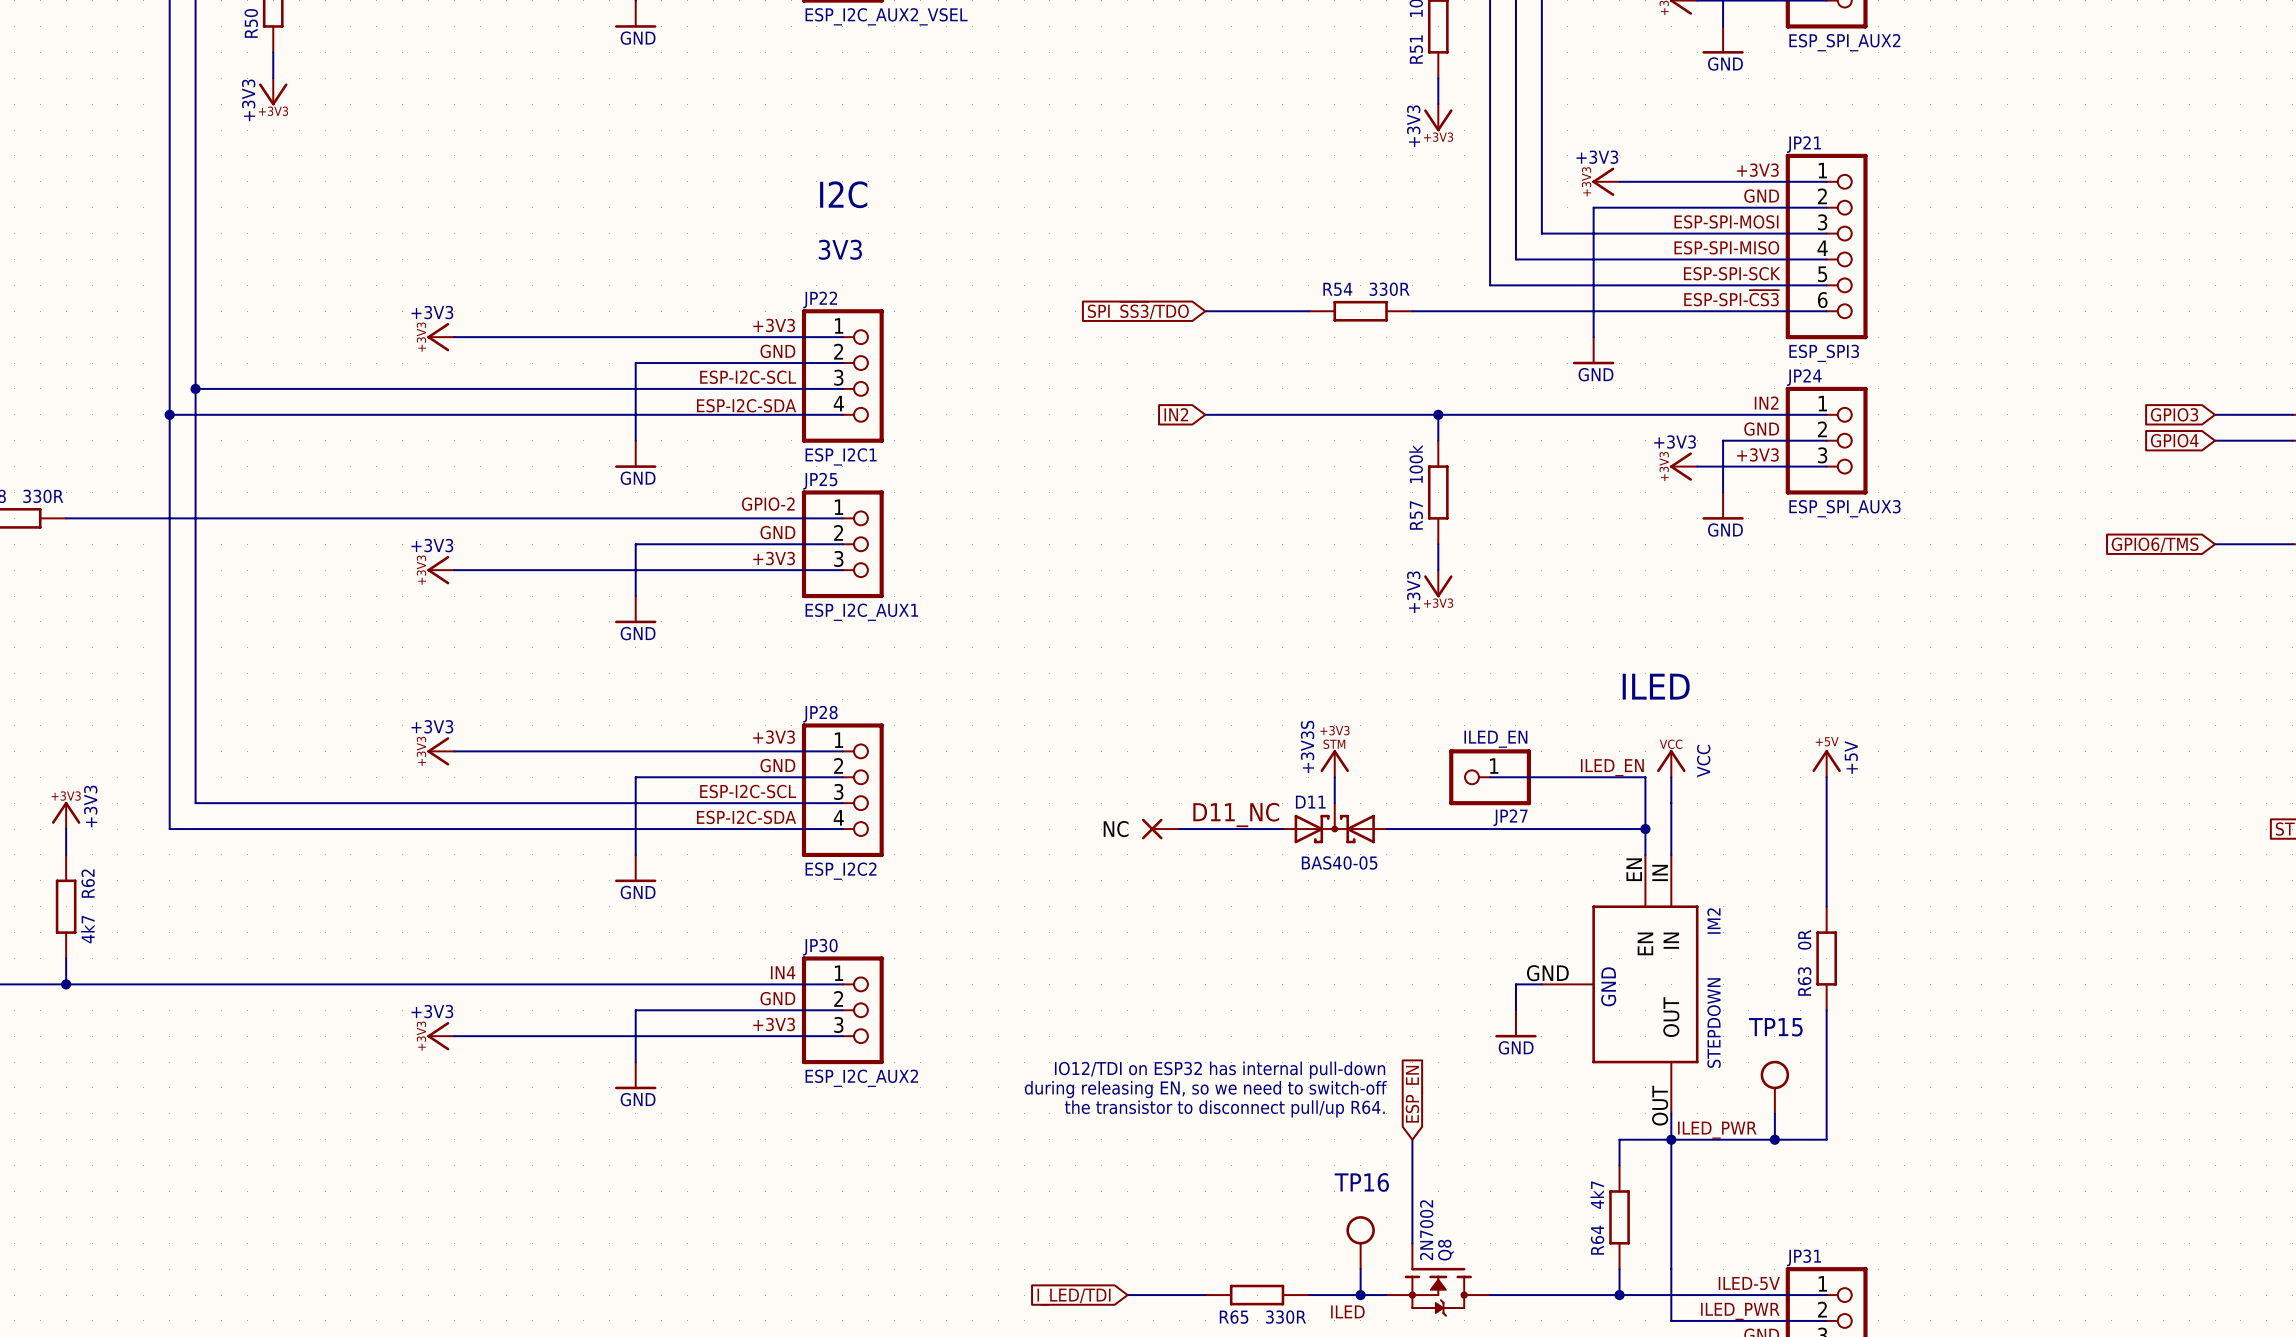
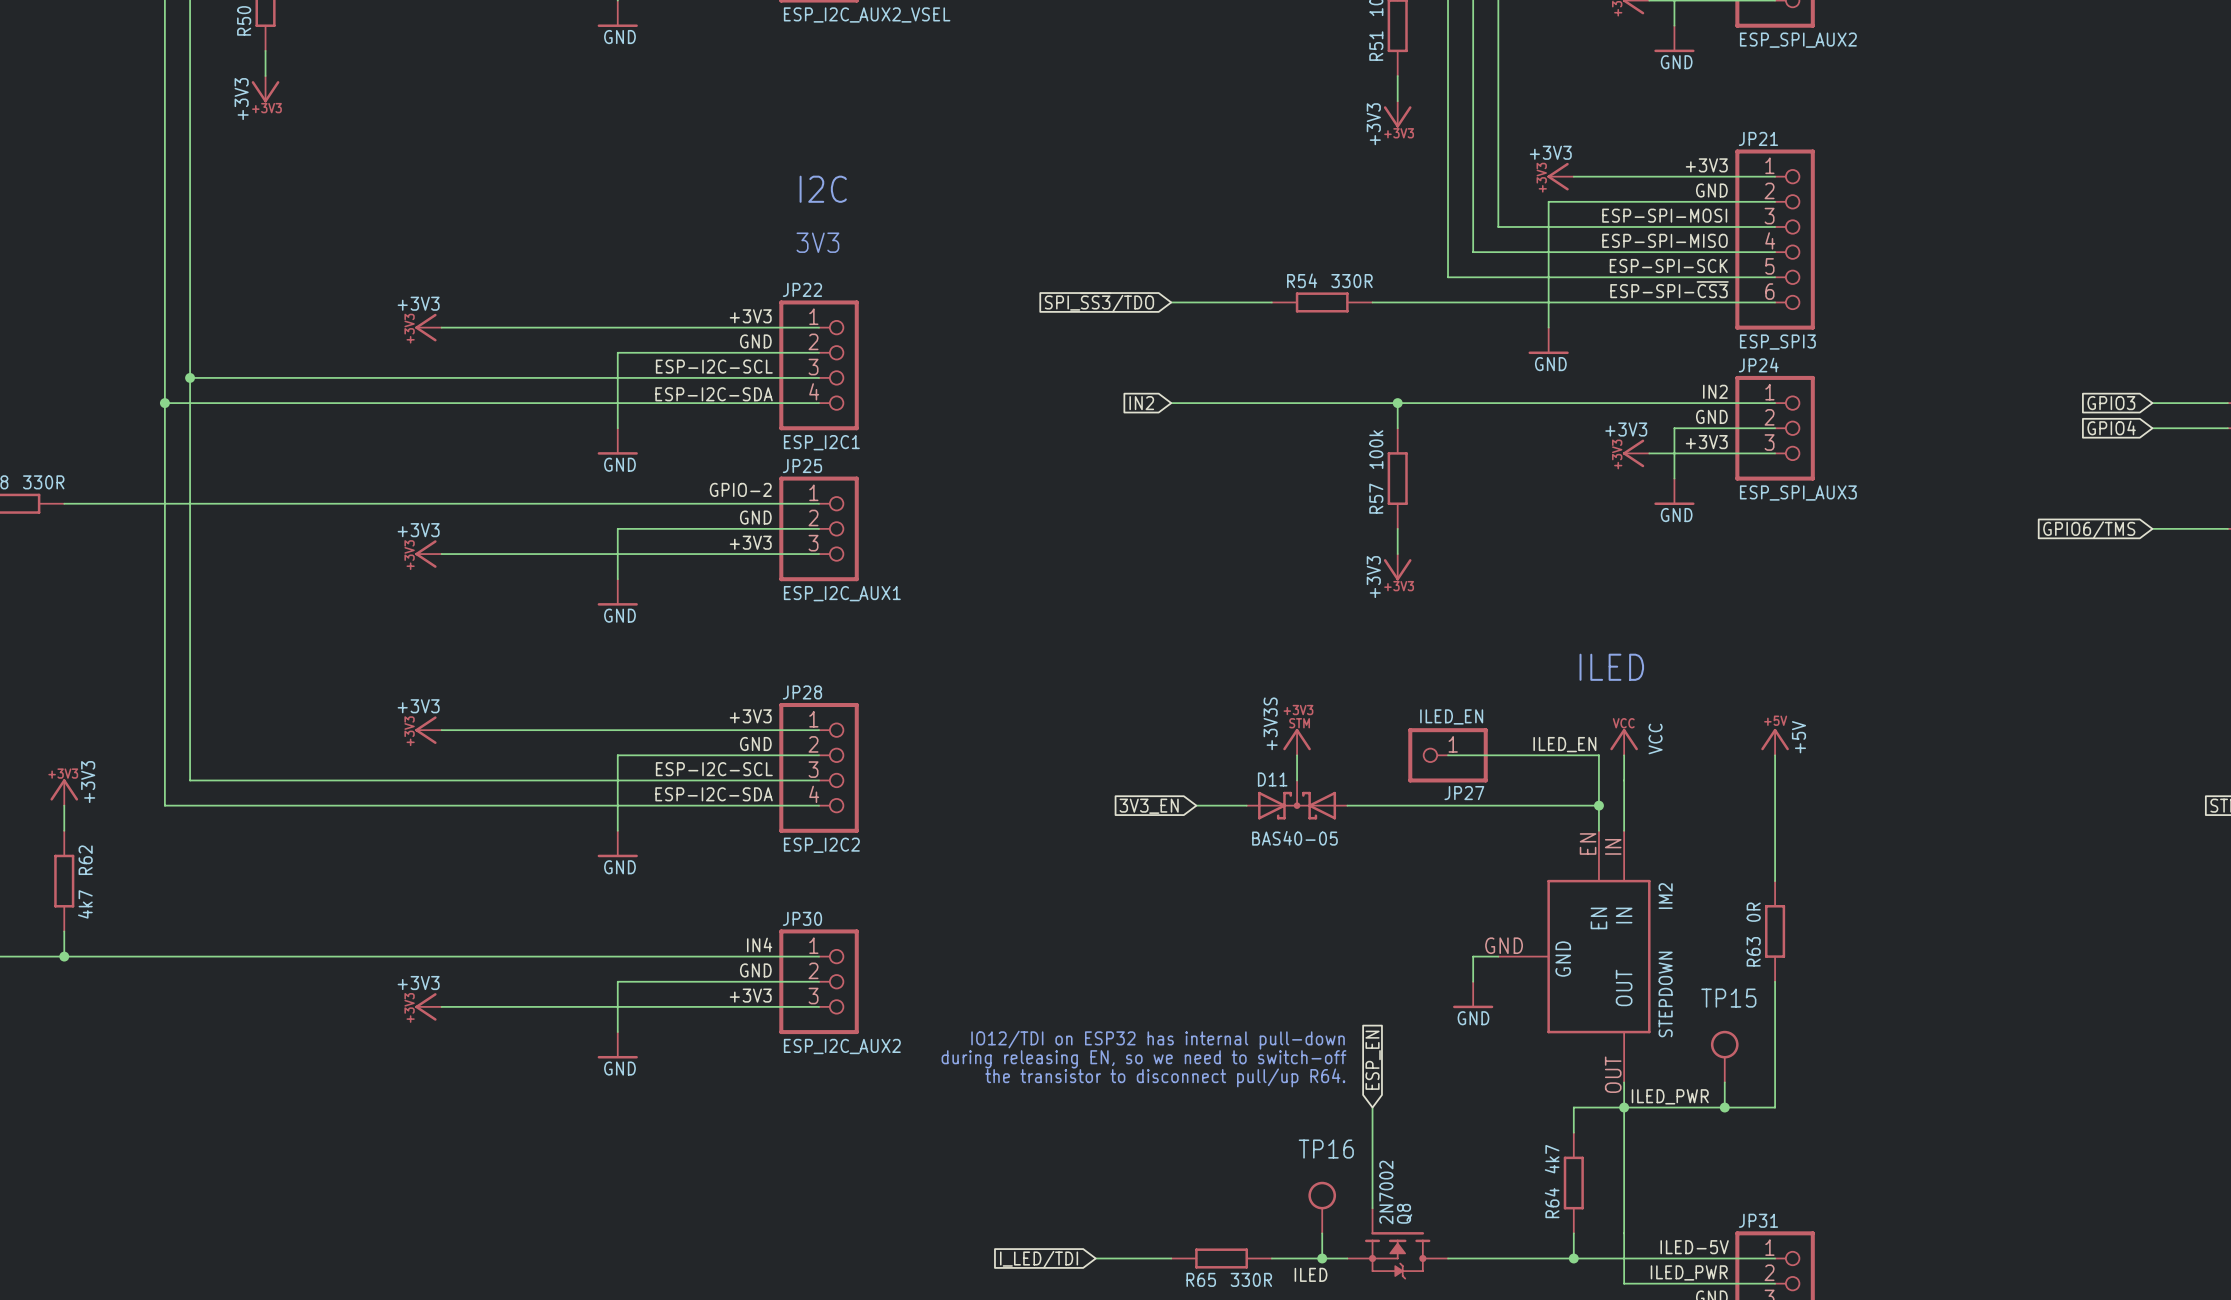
label: D11_NC (1236, 814) -> none
part: (1160, 829) -> none
wire: (1179, 829) (1231, 829) -> none
global label: none -> 3V3_EN (1149, 806)

